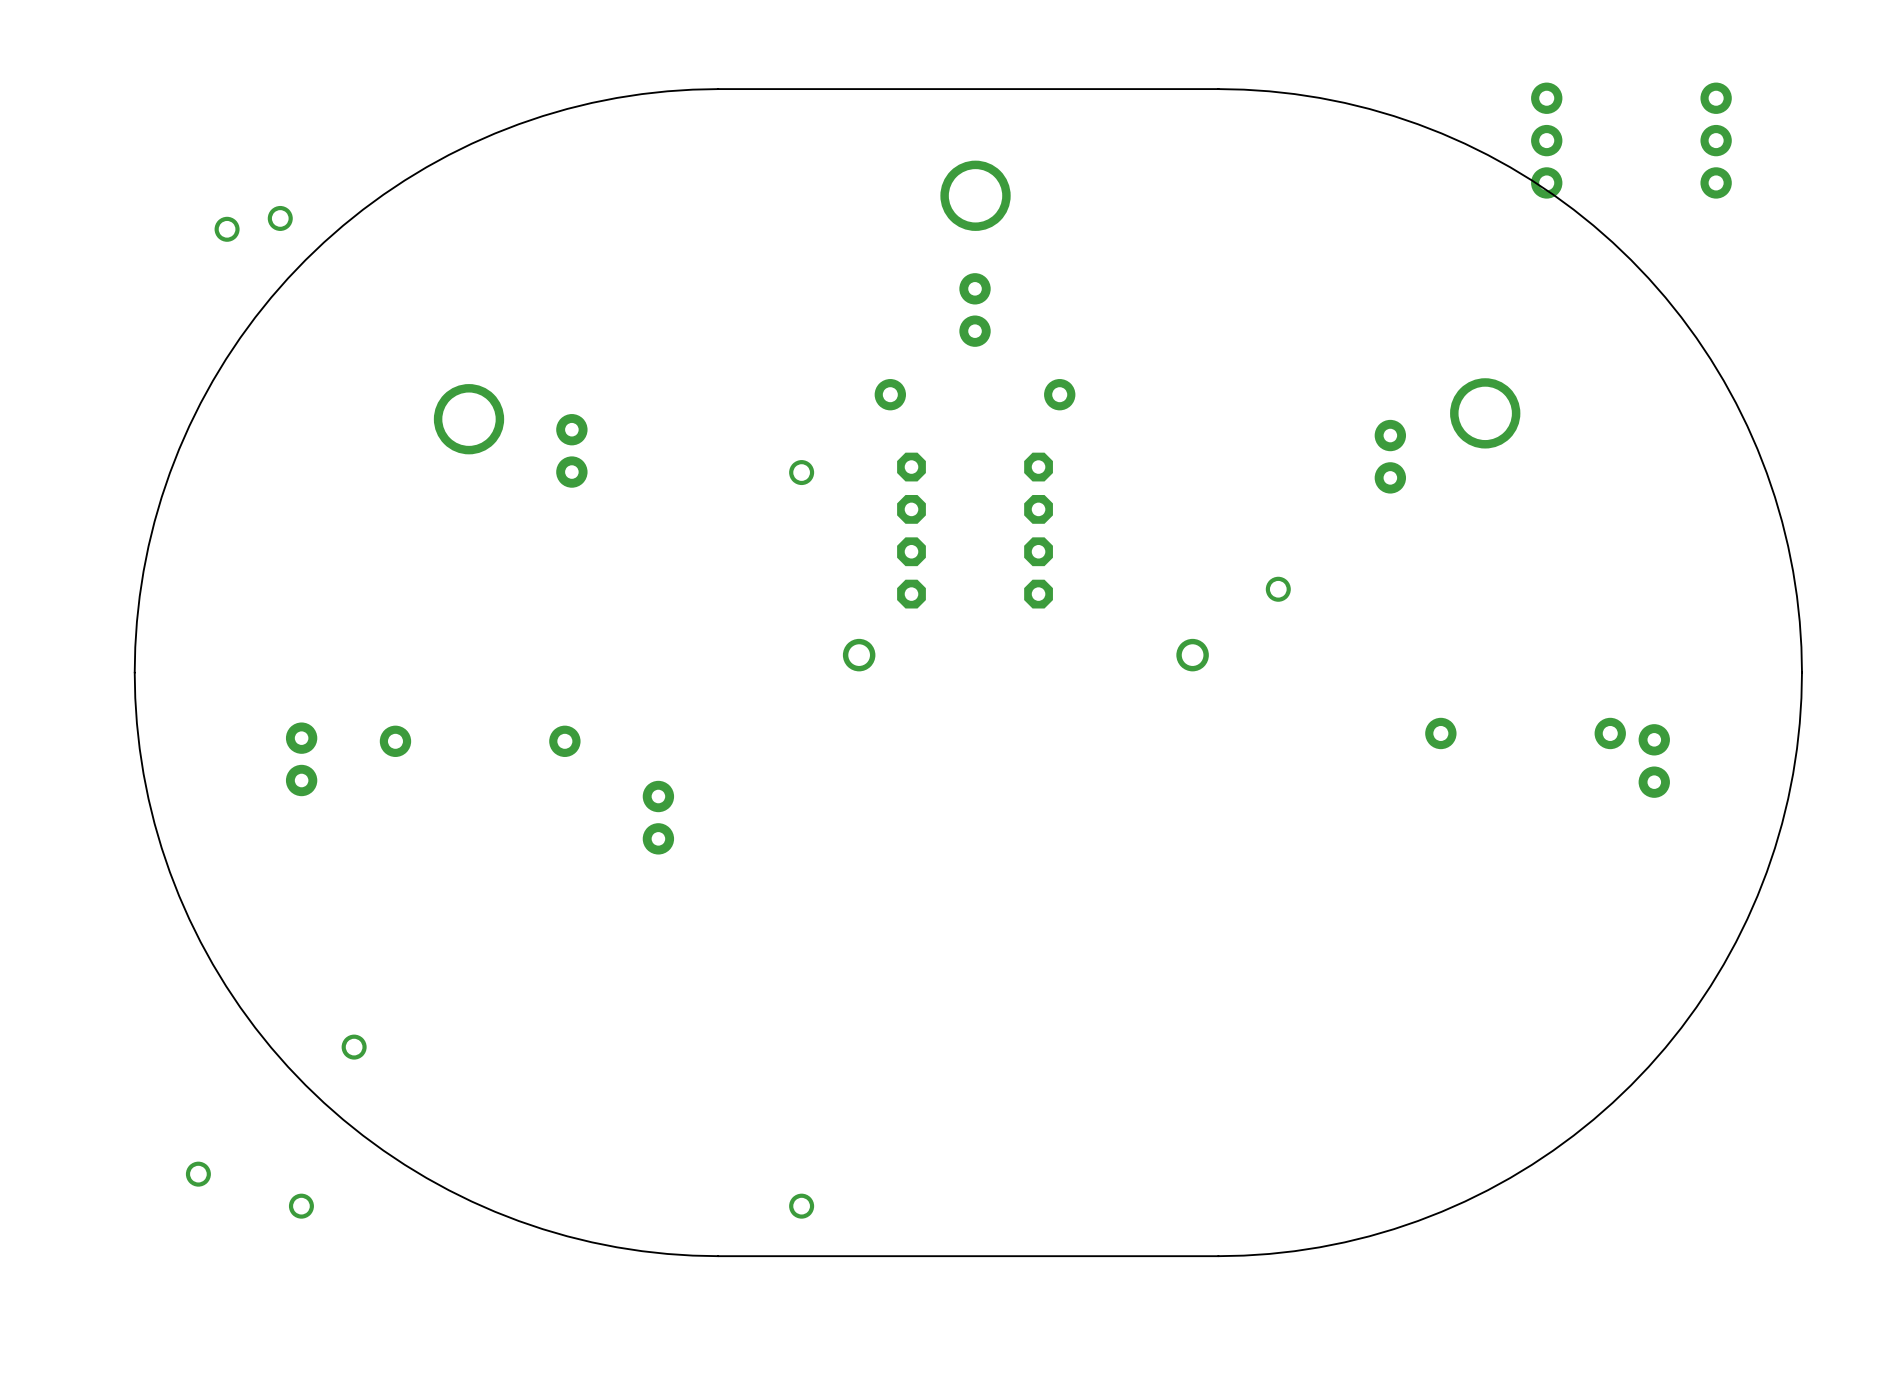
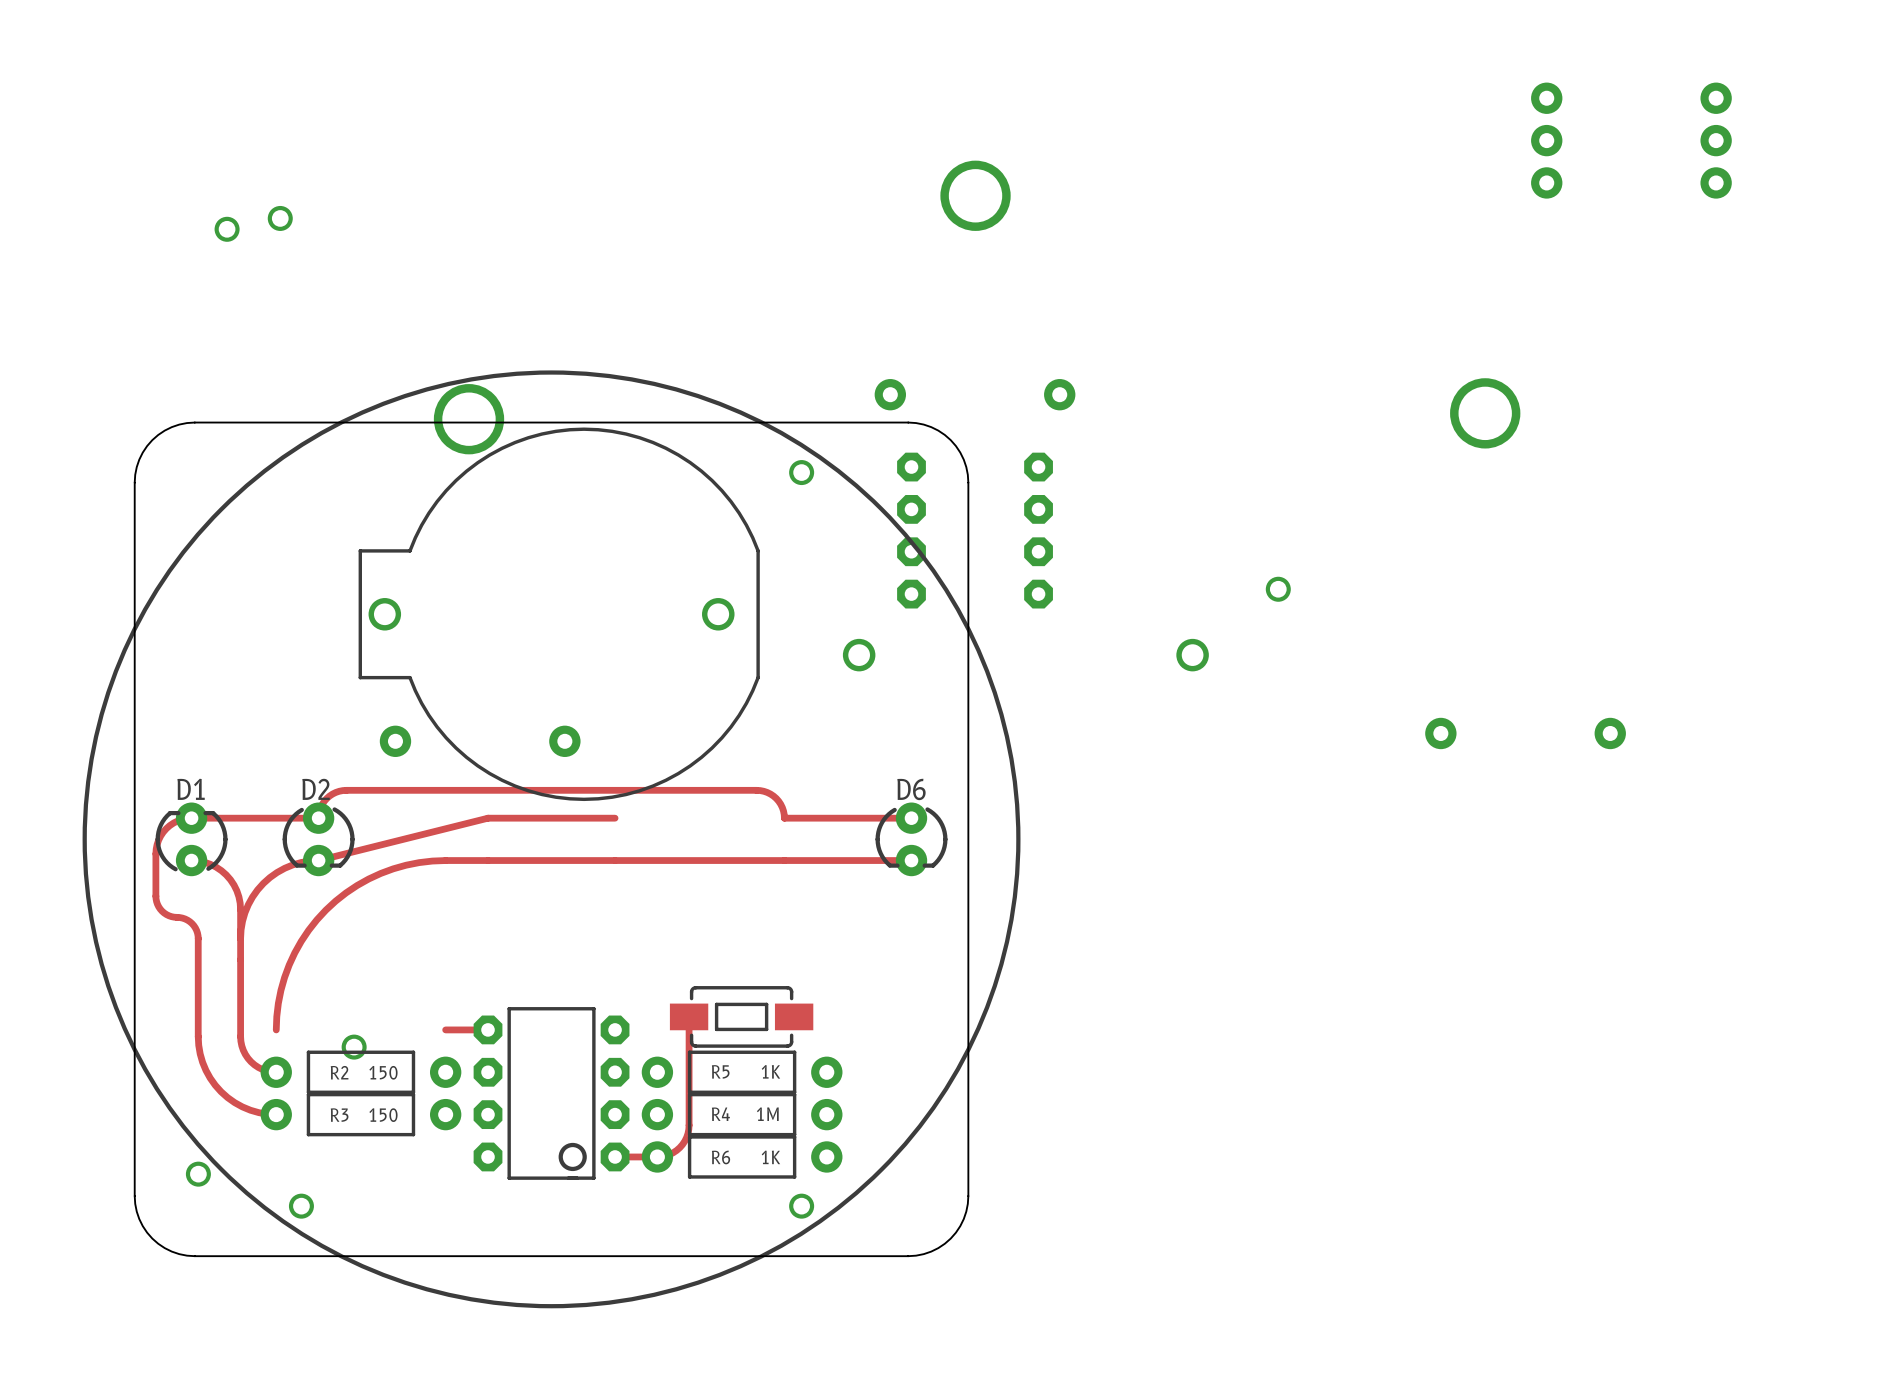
part: (975, 309) -> none
drawing: none -> [82, 370, 1021, 1309]
part: (571, 450) -> none
part: (1390, 456) -> none
part: none -> (559, 614)
D1 side: bottom (301, 759) -> top (191, 839)
part: (1654, 760) -> none
D6 side: bottom (658, 817) -> top (911, 839)
track: none -> (615, 818) (488, 818) (318, 860) (292, 864) (277, 872) (257, 889) (244, 912) (240, 938)
track: none -> (911, 818) (784, 818) (782, 807) (776, 798) (767, 792) (756, 790) (346, 790) (335, 792) (326, 798) (320, 807) (318, 818) (191, 818) (177, 820) (166, 828) (157, 844) (156, 898) (158, 906) (164, 913) (187, 920) (193, 925) (197, 933) (198, 1036) (202, 1062) (215, 1085) (234, 1102) (258, 1112) (276, 1114)
D2: none -> (318, 839)
track: none -> (191, 860) (210, 864) (221, 870) (230, 879) (236, 890) (240, 909) (241, 1045) (247, 1058) (254, 1064) (262, 1069) (276, 1072)
track: none -> (911, 860) (445, 860) (406, 865) (380, 873) (357, 885) (335, 901) (316, 919) (301, 941) (289, 965) (280, 990) (276, 1029)
track: none -> (689, 1016) (689, 1125) (684, 1141) (676, 1150) (665, 1155) (615, 1156)
part: none -> (741, 1016)
track: none -> (445, 1029) (488, 1029)
R2: none -> 150 (360, 1072)
R5: none -> 1K (742, 1072)
part: none -> (551, 1093)
R3: none -> 150 (360, 1114)
R4: none -> 1M (742, 1114)
R6: none -> 1K (742, 1156)
board edge: (718, 1256) (642, 1251) (567, 1236) (494, 1211) (426, 1177) (363, 1135) (324, 1102) (288, 1066) (240, 1007) (200, 942) (169, 872) (148, 798) (136, 723) (135, 647) (143, 571) (161, 497) (179, 449) (200, 403) (240, 337) (271, 297) (324, 242) (363, 209) (426, 167) (471, 143) (542, 116) (591, 102) (642, 94) (718, 89) (1218, 89) (1269, 91) (1319, 97) (1369, 108) (1441, 133) (1487, 155) (1531, 180) (1573, 209) (1612, 242) (1665, 297) (1710, 359) (1736, 403) (1757, 449) (1774, 497) (1788, 546) (1797, 596) (1801, 647) (1799, 723) (1793, 773) (1782, 823) (1757, 895) (1736, 942) (1710, 986) (1681, 1027) (1648, 1066) (1593, 1119) (1553, 1150) (1510, 1177) (1465, 1201) (1418, 1220) (1344, 1242) (1269, 1253) (1218, 1256) (908, 1256) -> (718, 1256) (194, 1256) (171, 1251) (158, 1243) (147, 1232) (136, 1211) (134, 1196) (134, 482) (139, 459) (147, 446) (158, 434) (179, 424) (194, 422) (908, 422) (931, 427) (950, 440) (963, 459) (968, 482) (968, 1196) (963, 1219) (950, 1238) (931, 1251) (908, 1256)

